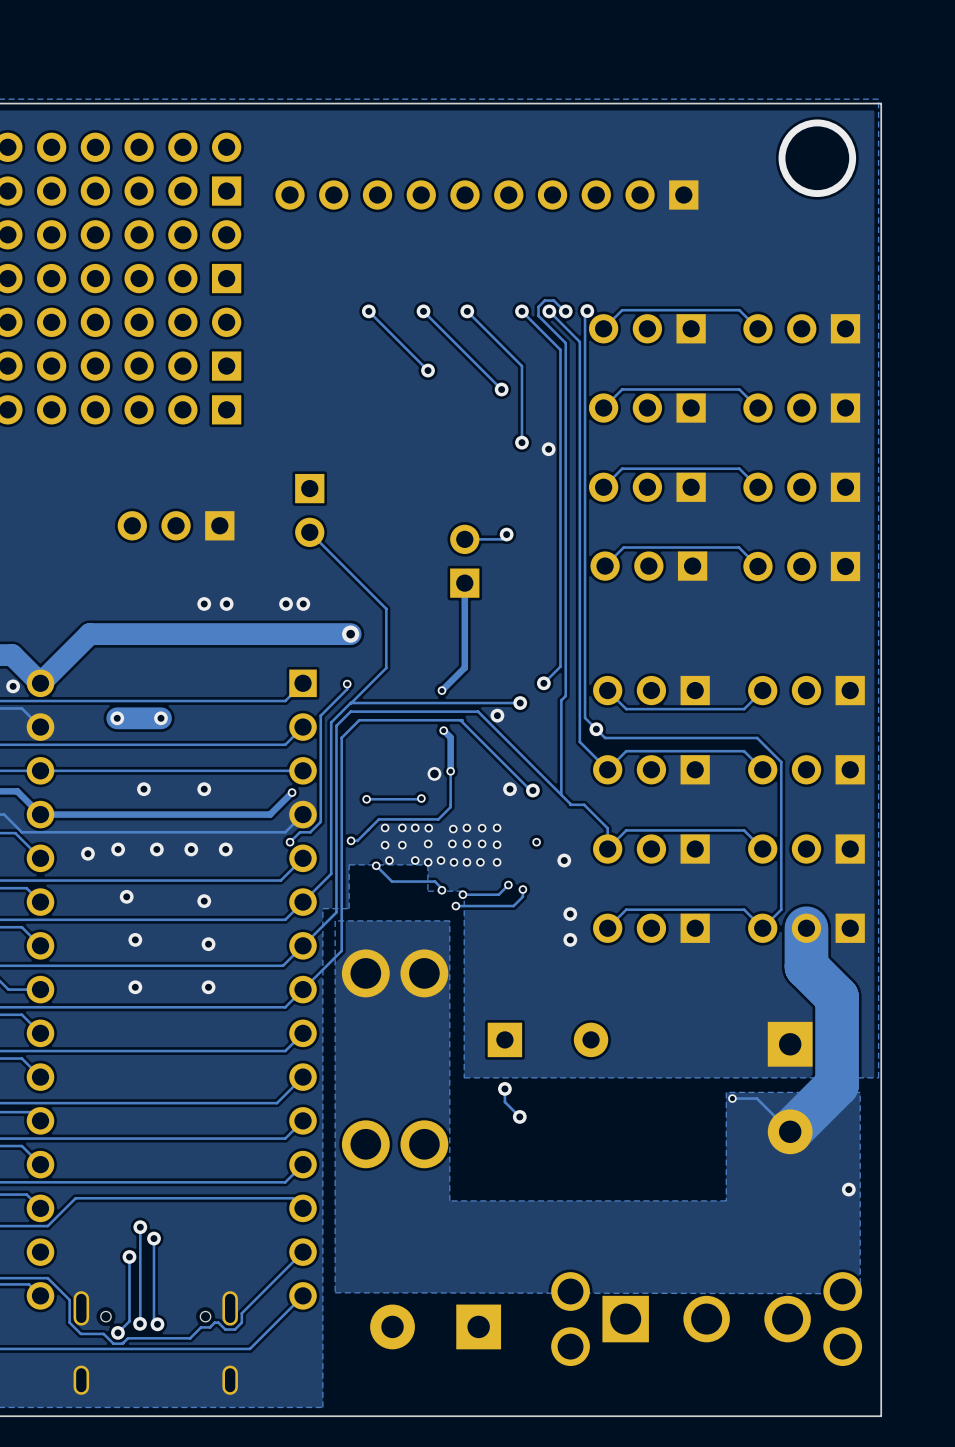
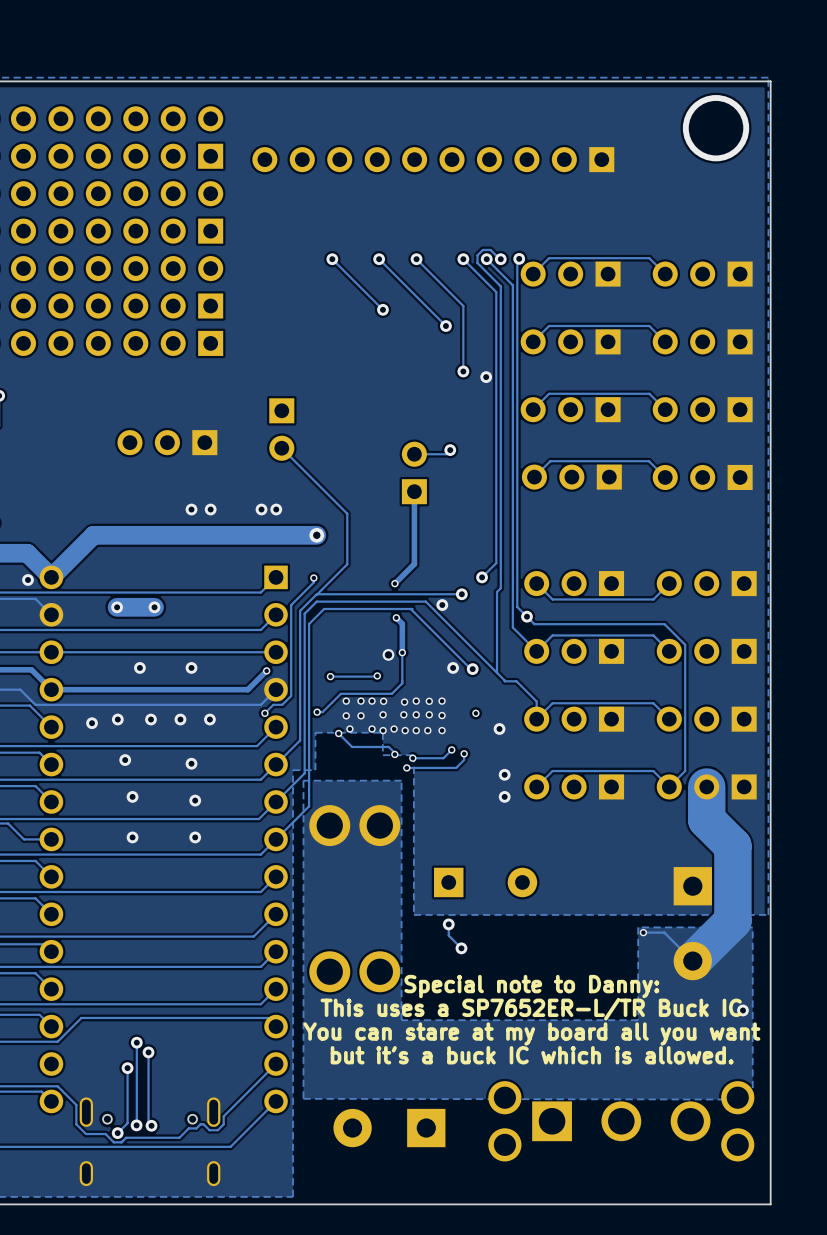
text: none -> Special note to Danny: (531, 986)
text: none -> This uses a SP7652ER-L/TR Buck IC (531, 1009)
text: none -> You can stare at my board all you want (531, 1033)
text: none -> but it's a buck IC which is allowed. (532, 1055)

